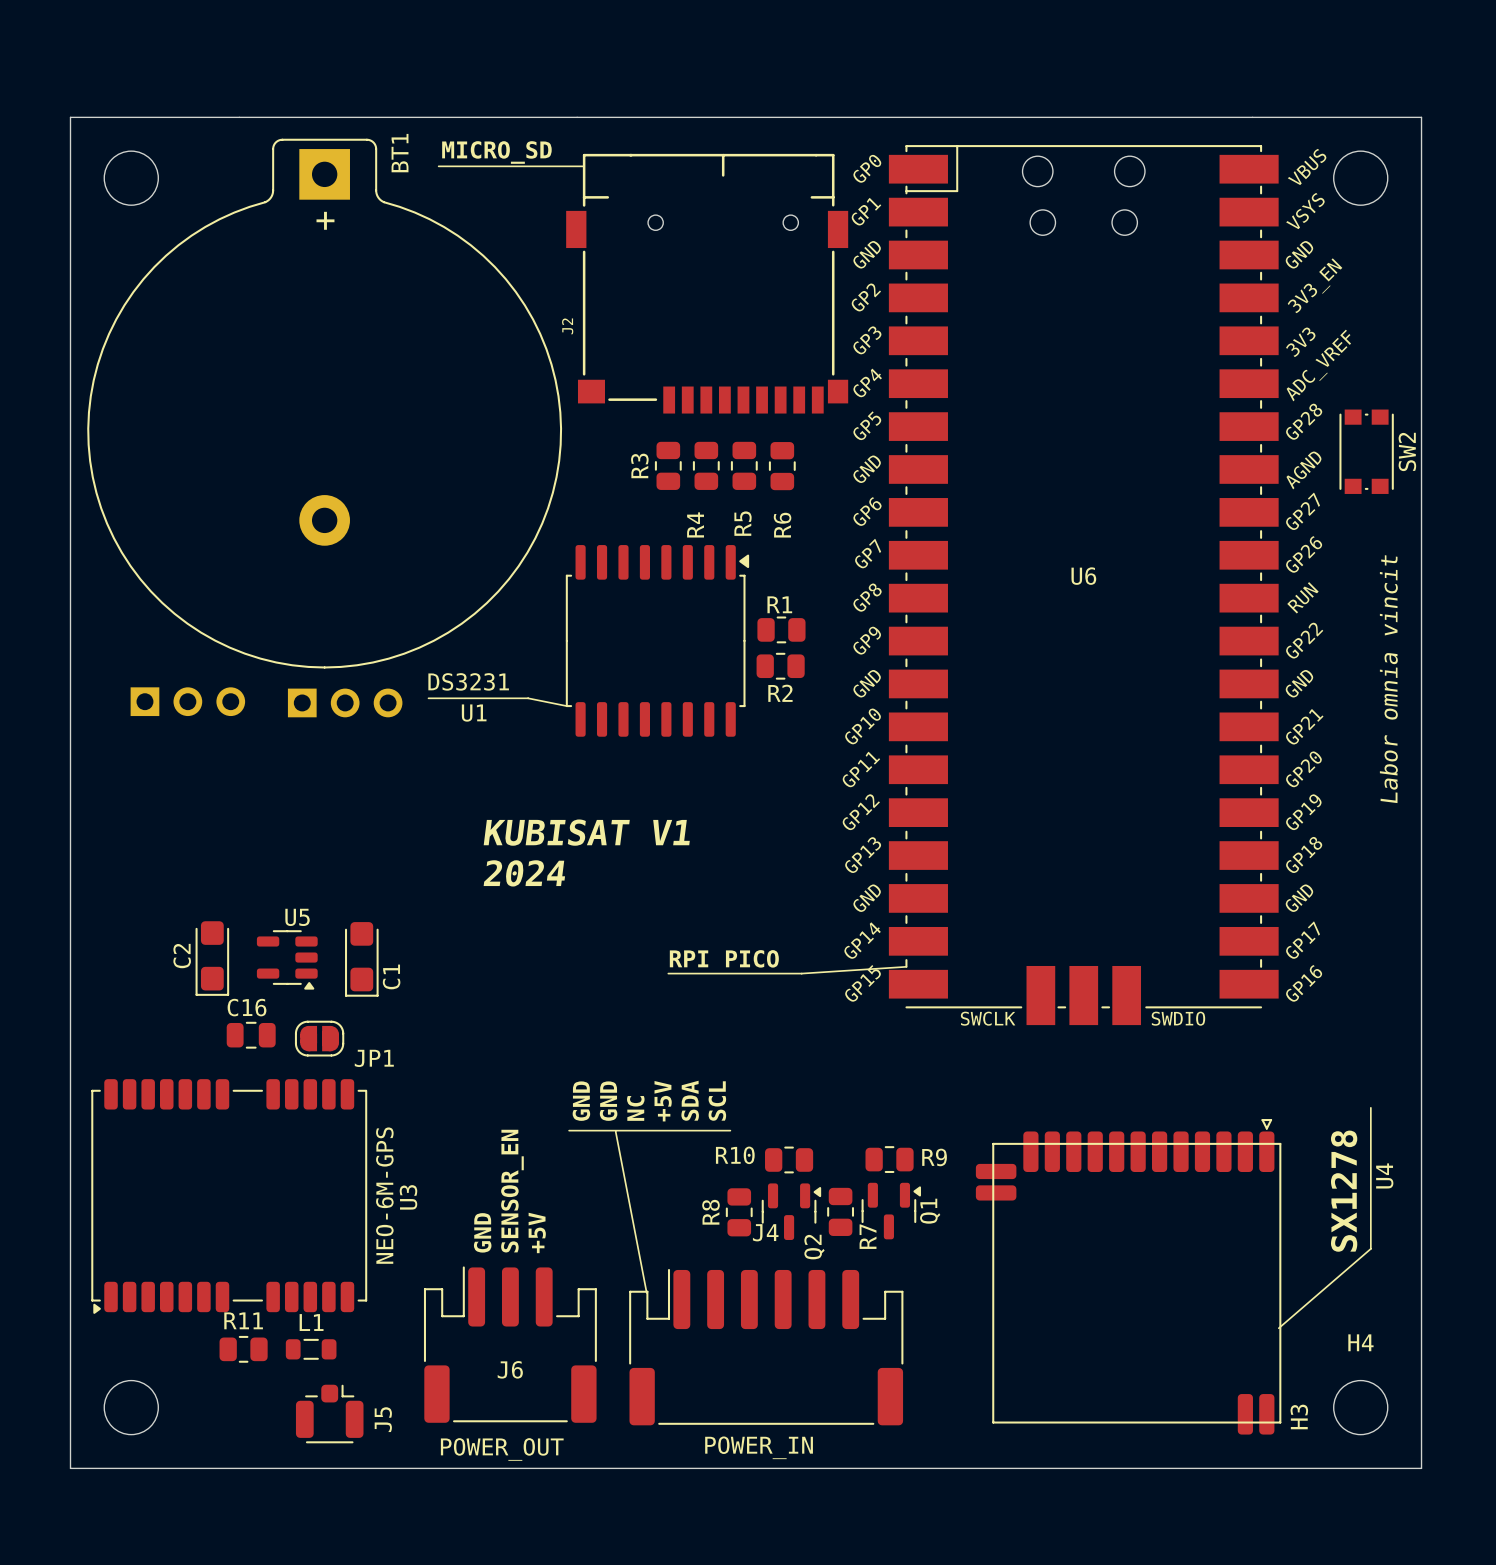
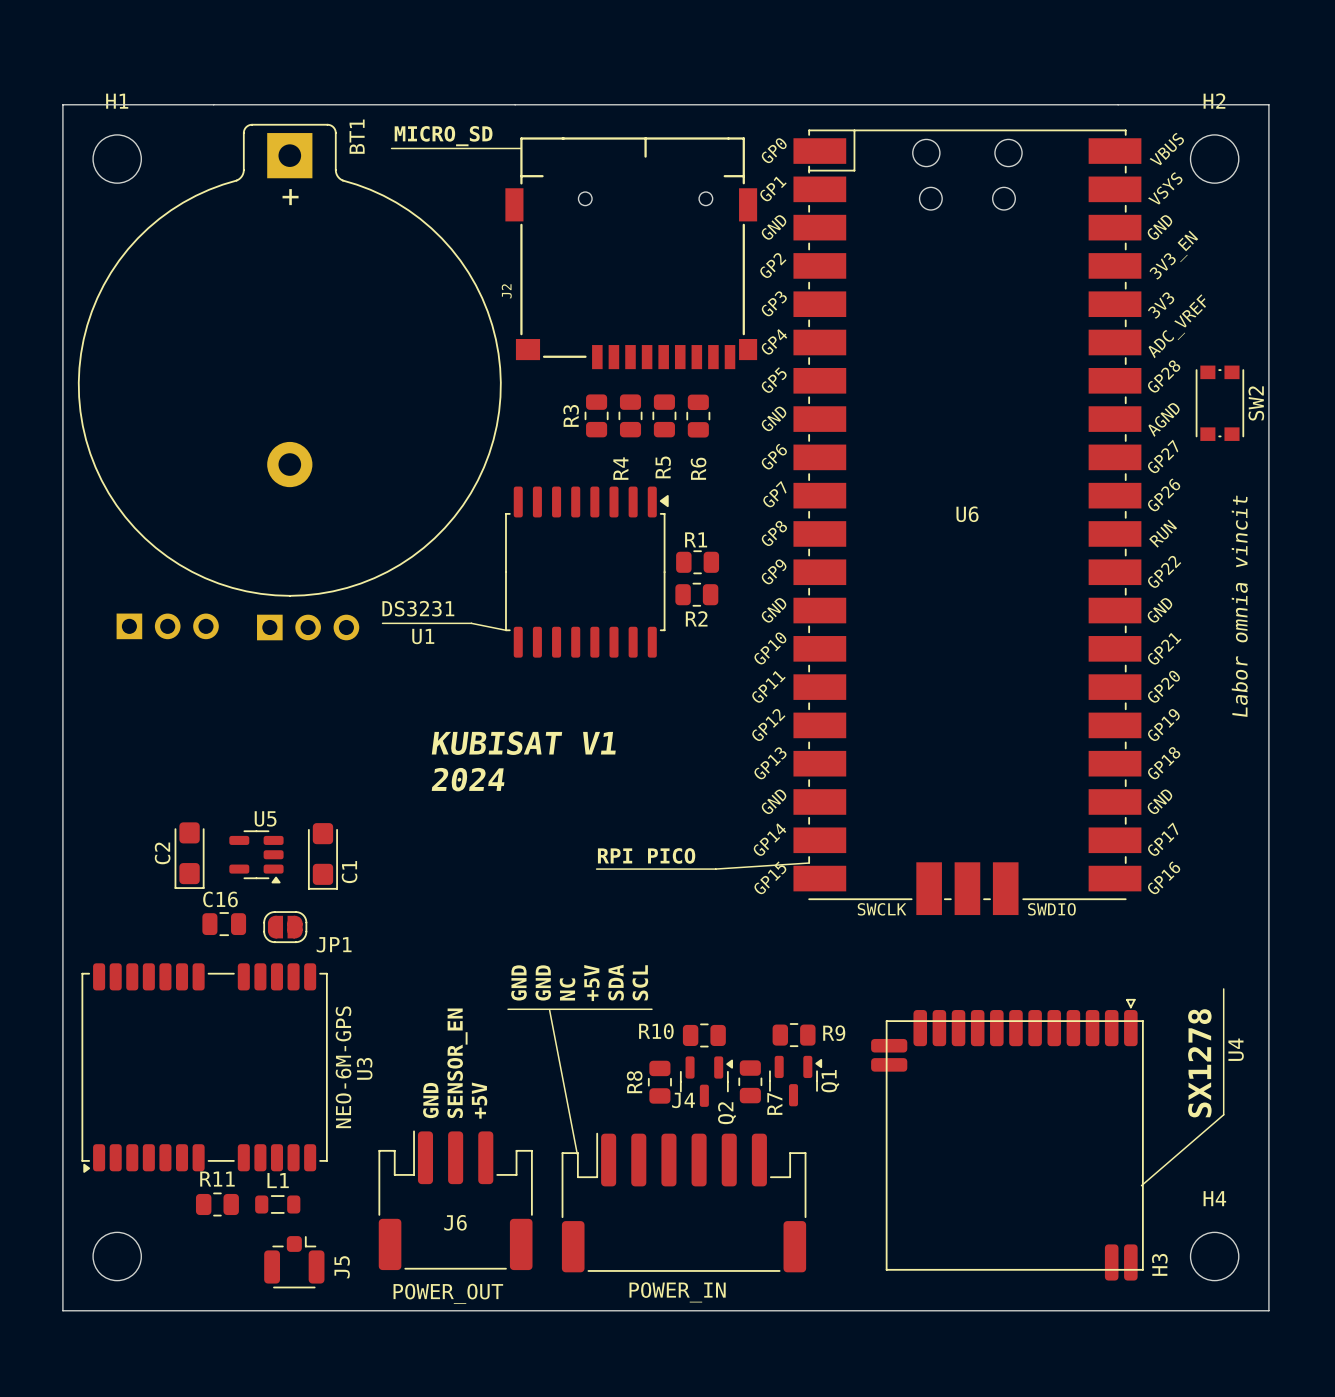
H1 name: none -> H1 (117, 101)
H2 name: none -> H2 (1214, 101)

